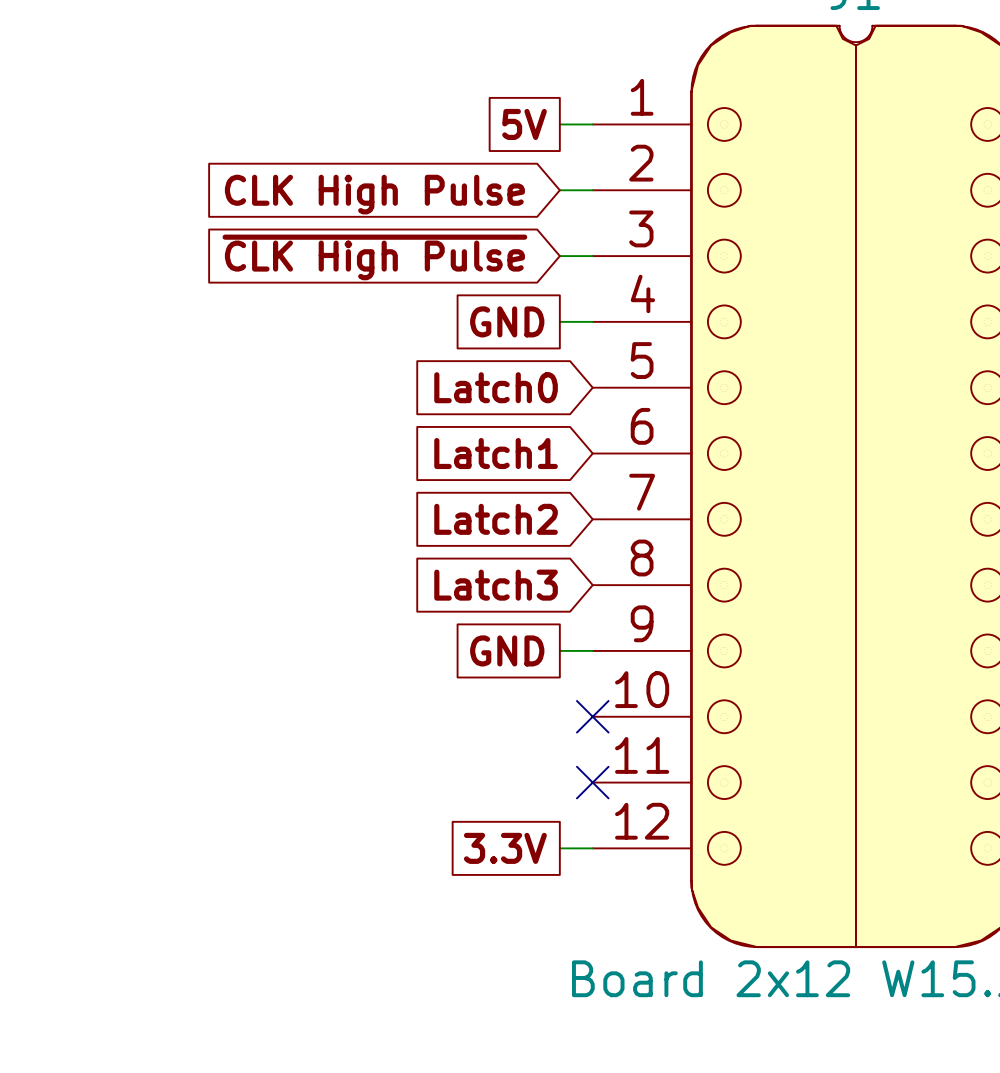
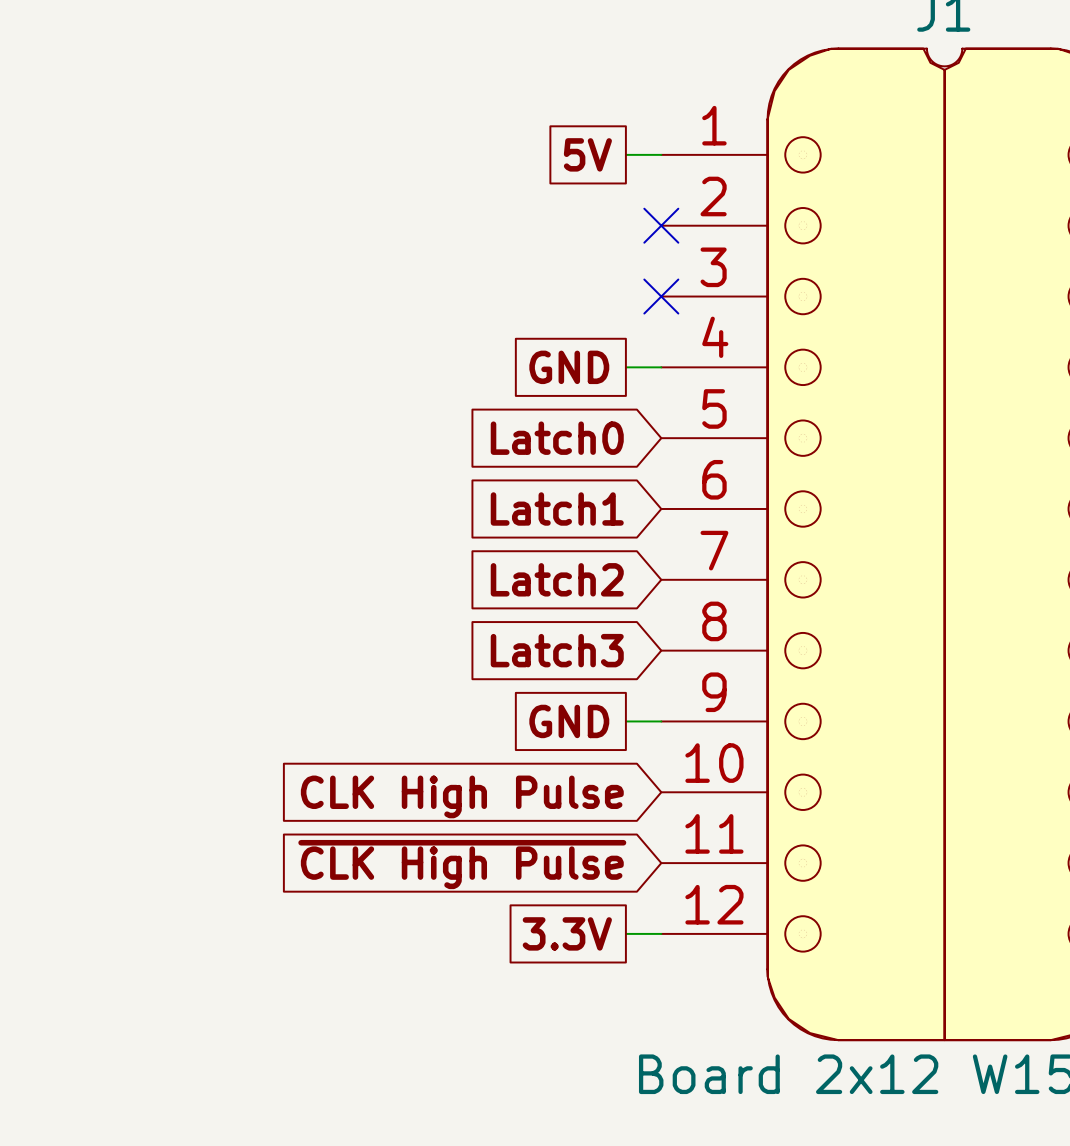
wire: (559, 190) (592, 190) -> none
no-connect mark: none -> (661, 225)
global label position: CLK High Pulse (374, 194) -> CLK High Pulse (462, 796)
wire: (559, 256) (592, 256) -> none
no-connect mark: none -> (661, 296)
global label position: ~{CLK High Pulse} (374, 257) -> ~{CLK High Pulse} (462, 864)
no-connect mark: (592, 716) -> none
no-connect mark: (592, 782) -> none

